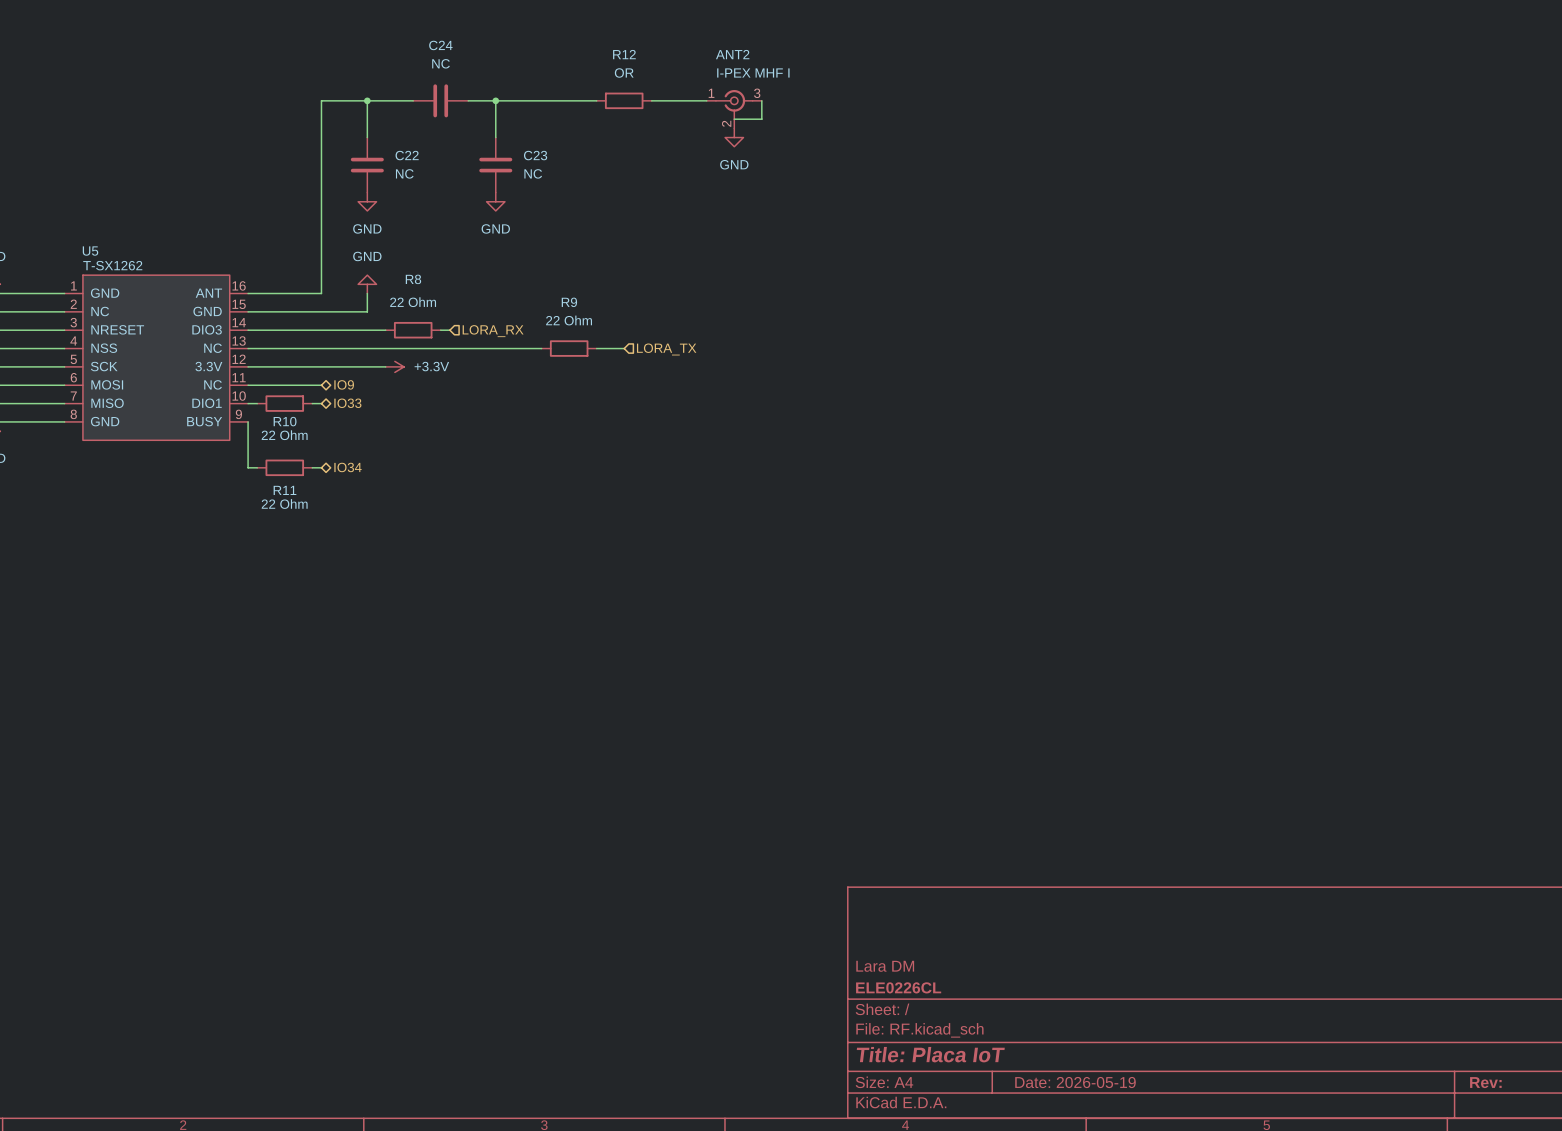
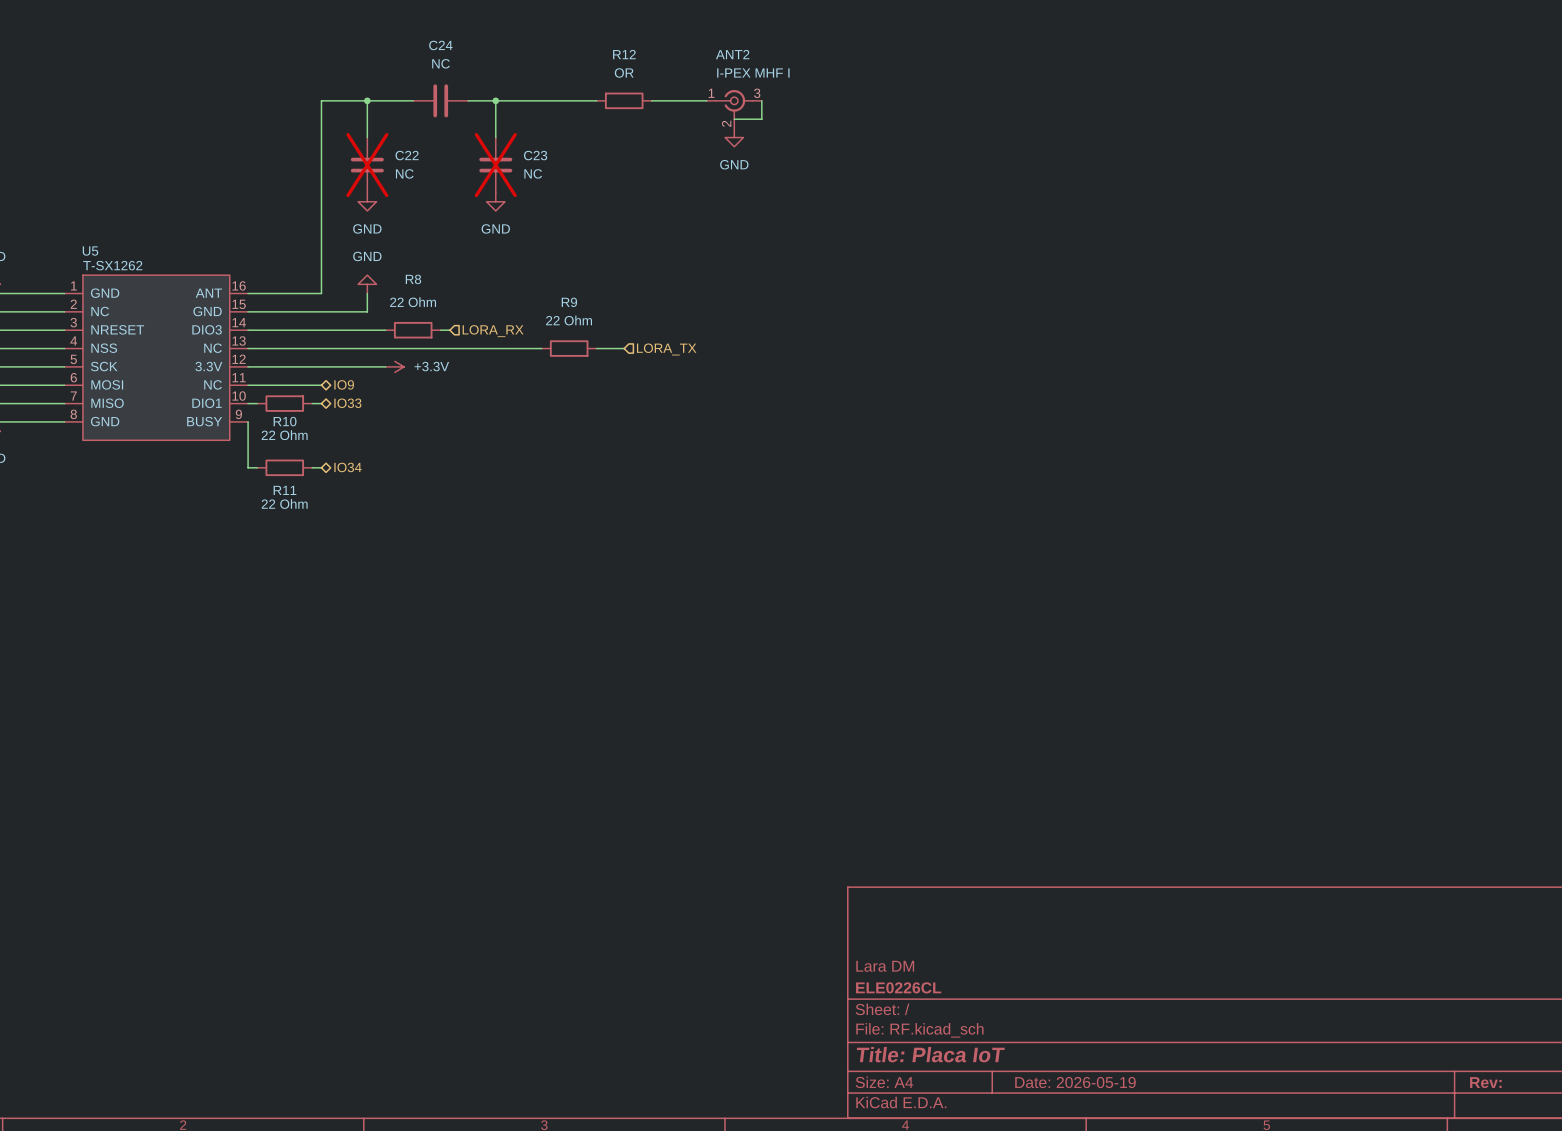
C22 do-not-place cross: none -> (367, 165)
C23 do-not-place cross: none -> (495, 165)

